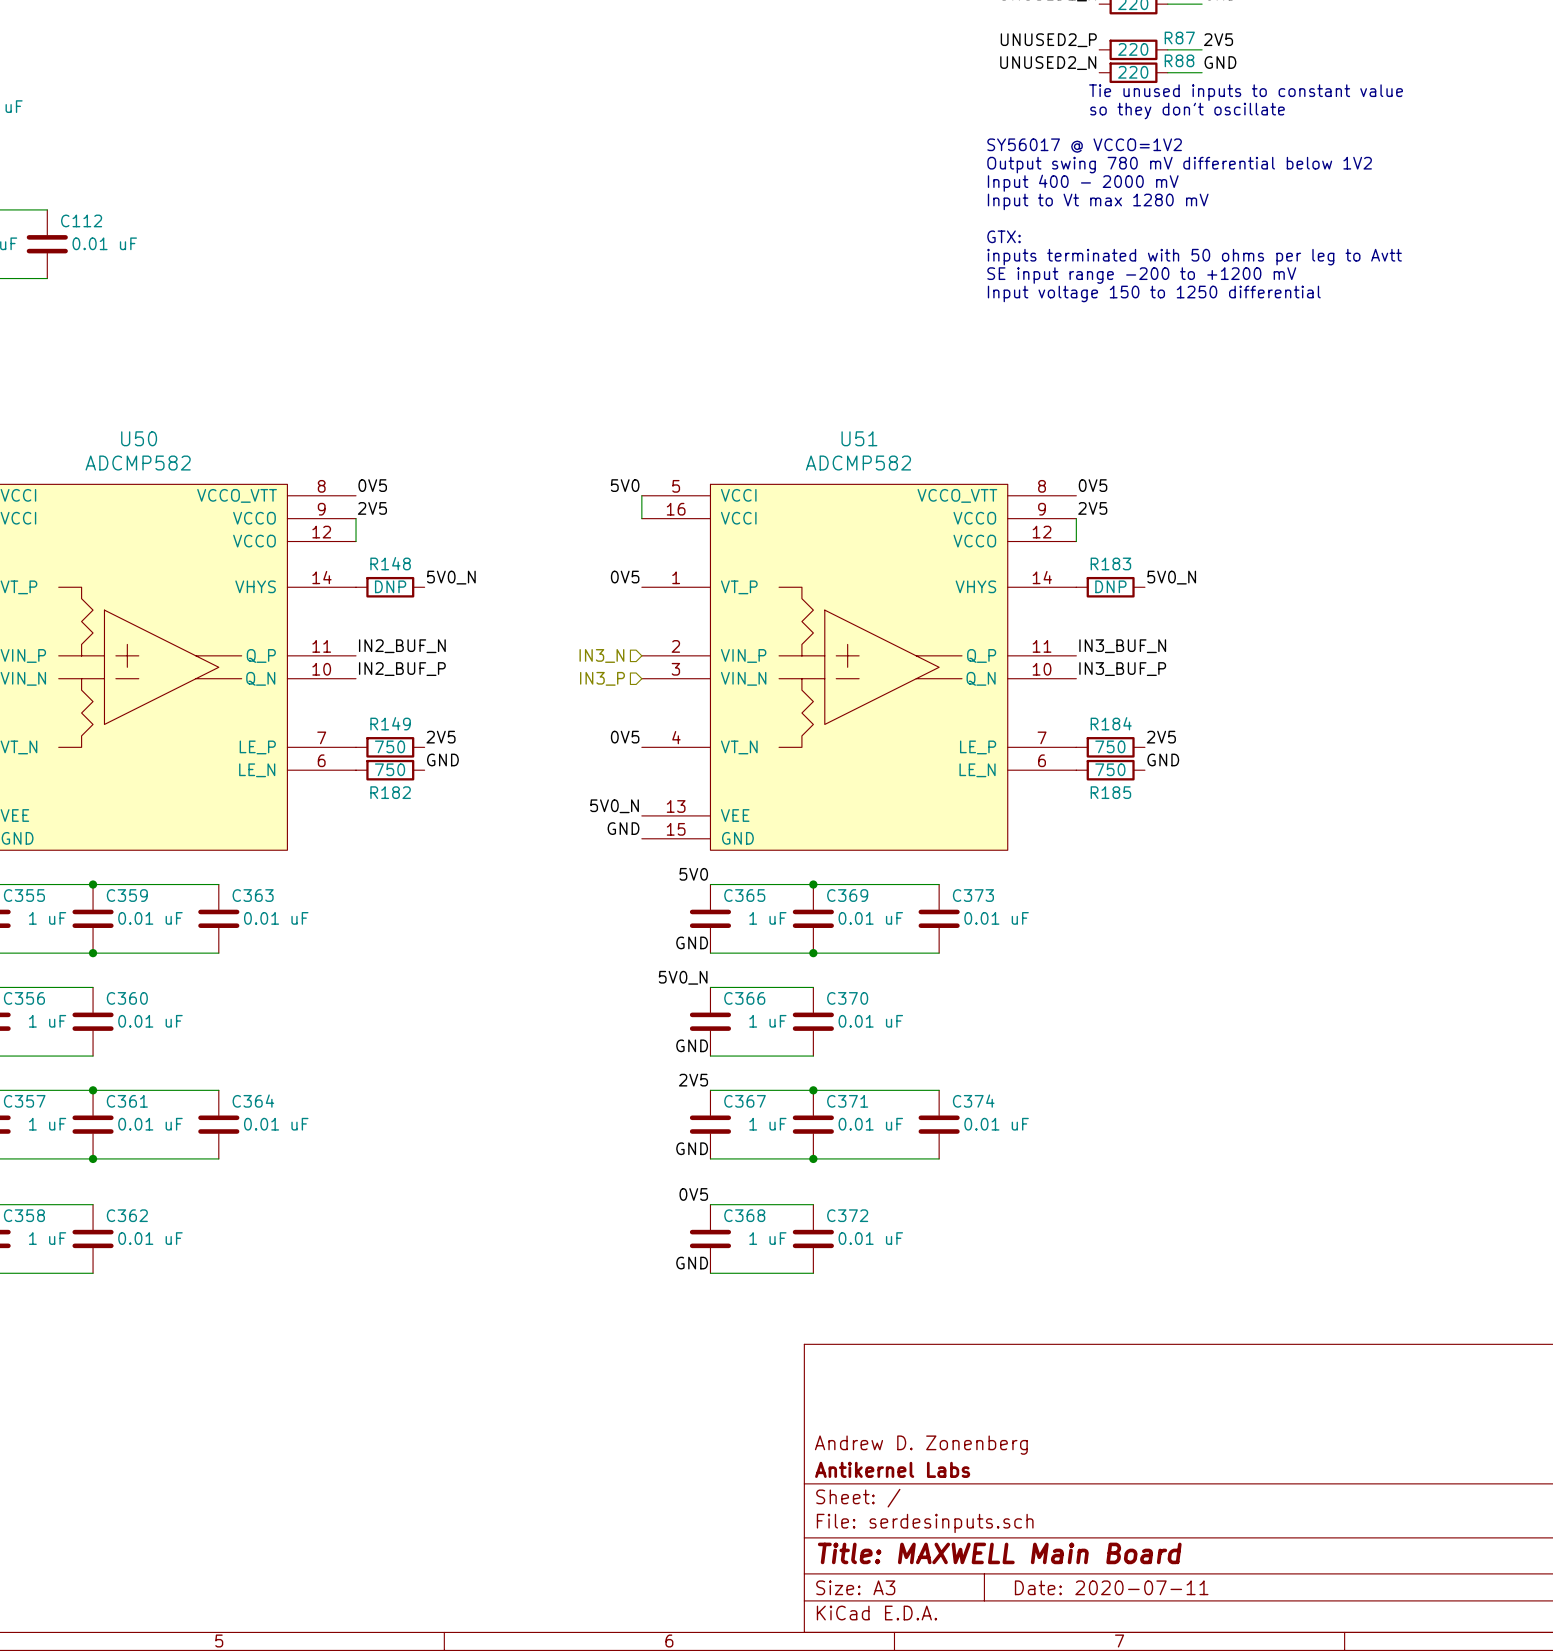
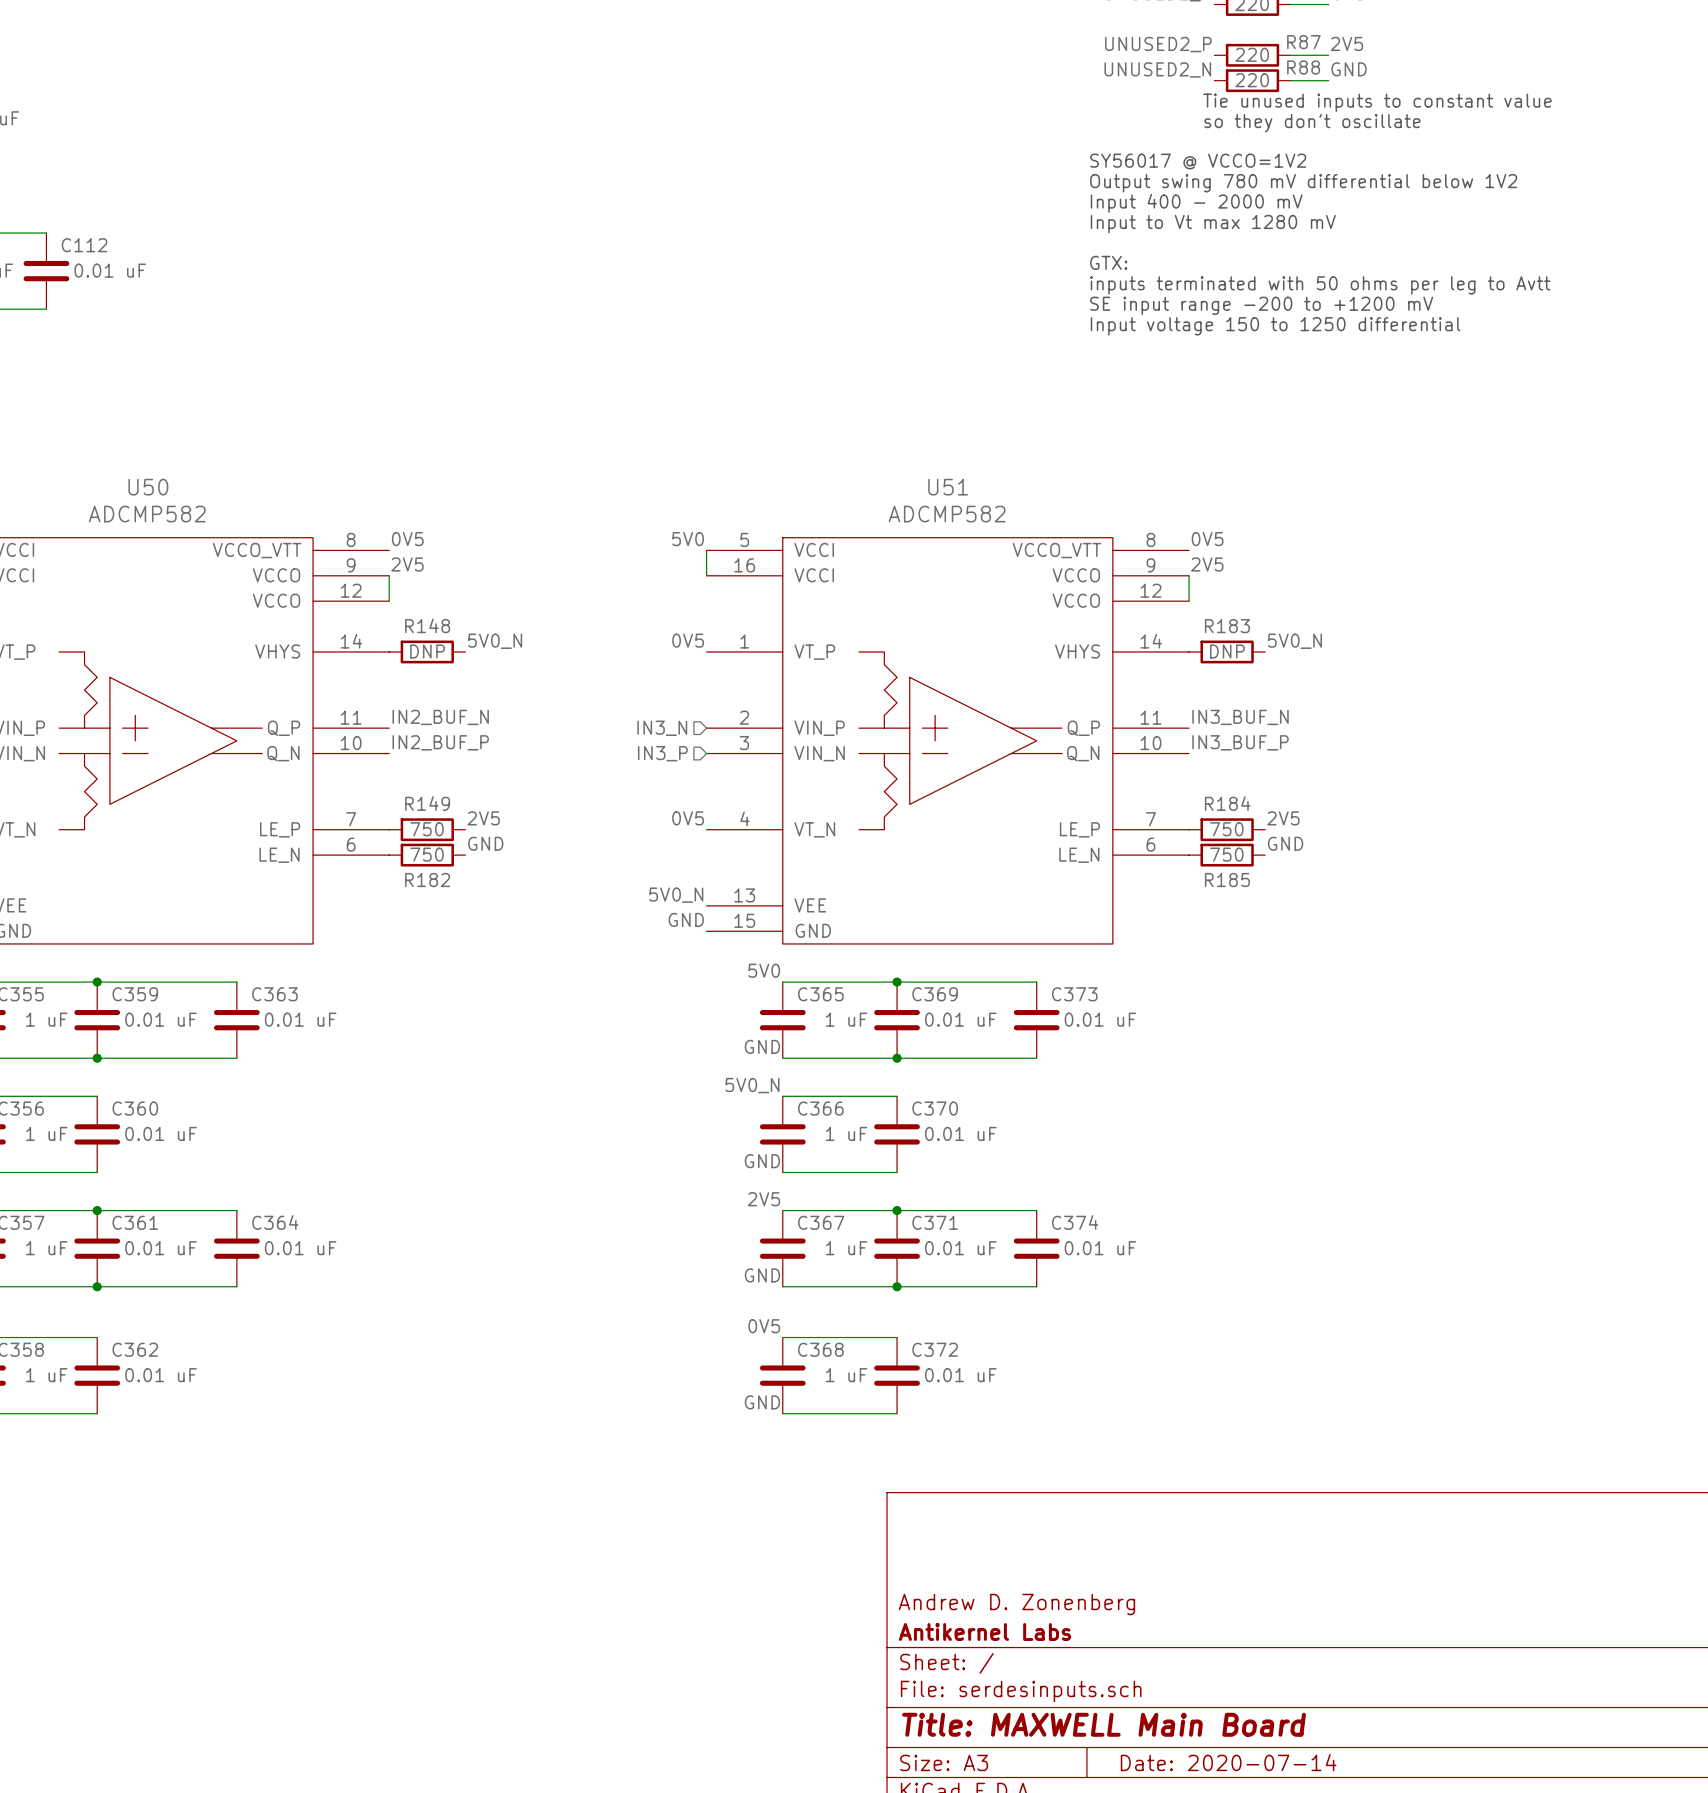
title block: Date: 2020-07-11 (1111, 1587) -> Date: 2020-07-14 (1228, 1762)

